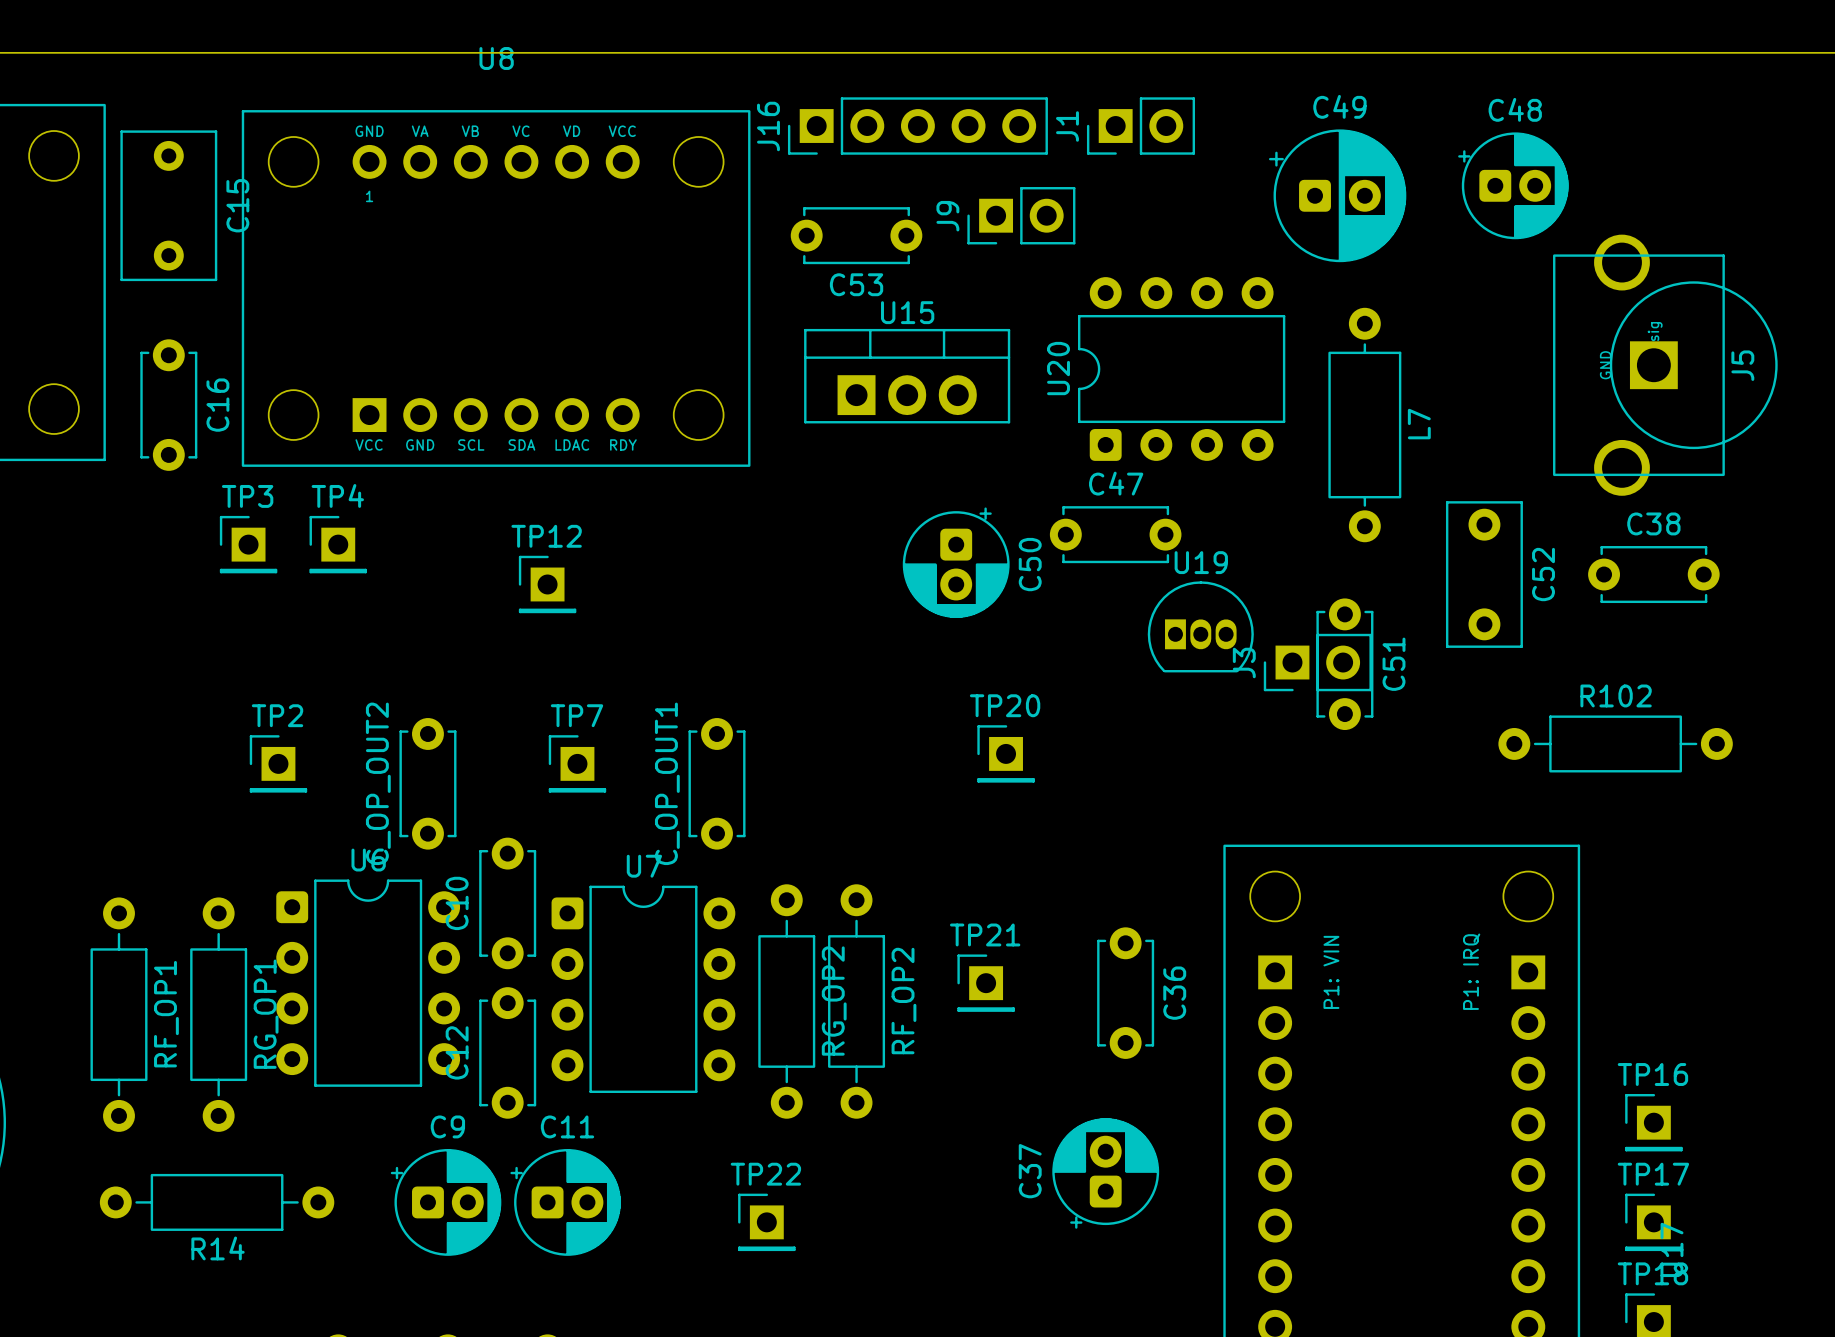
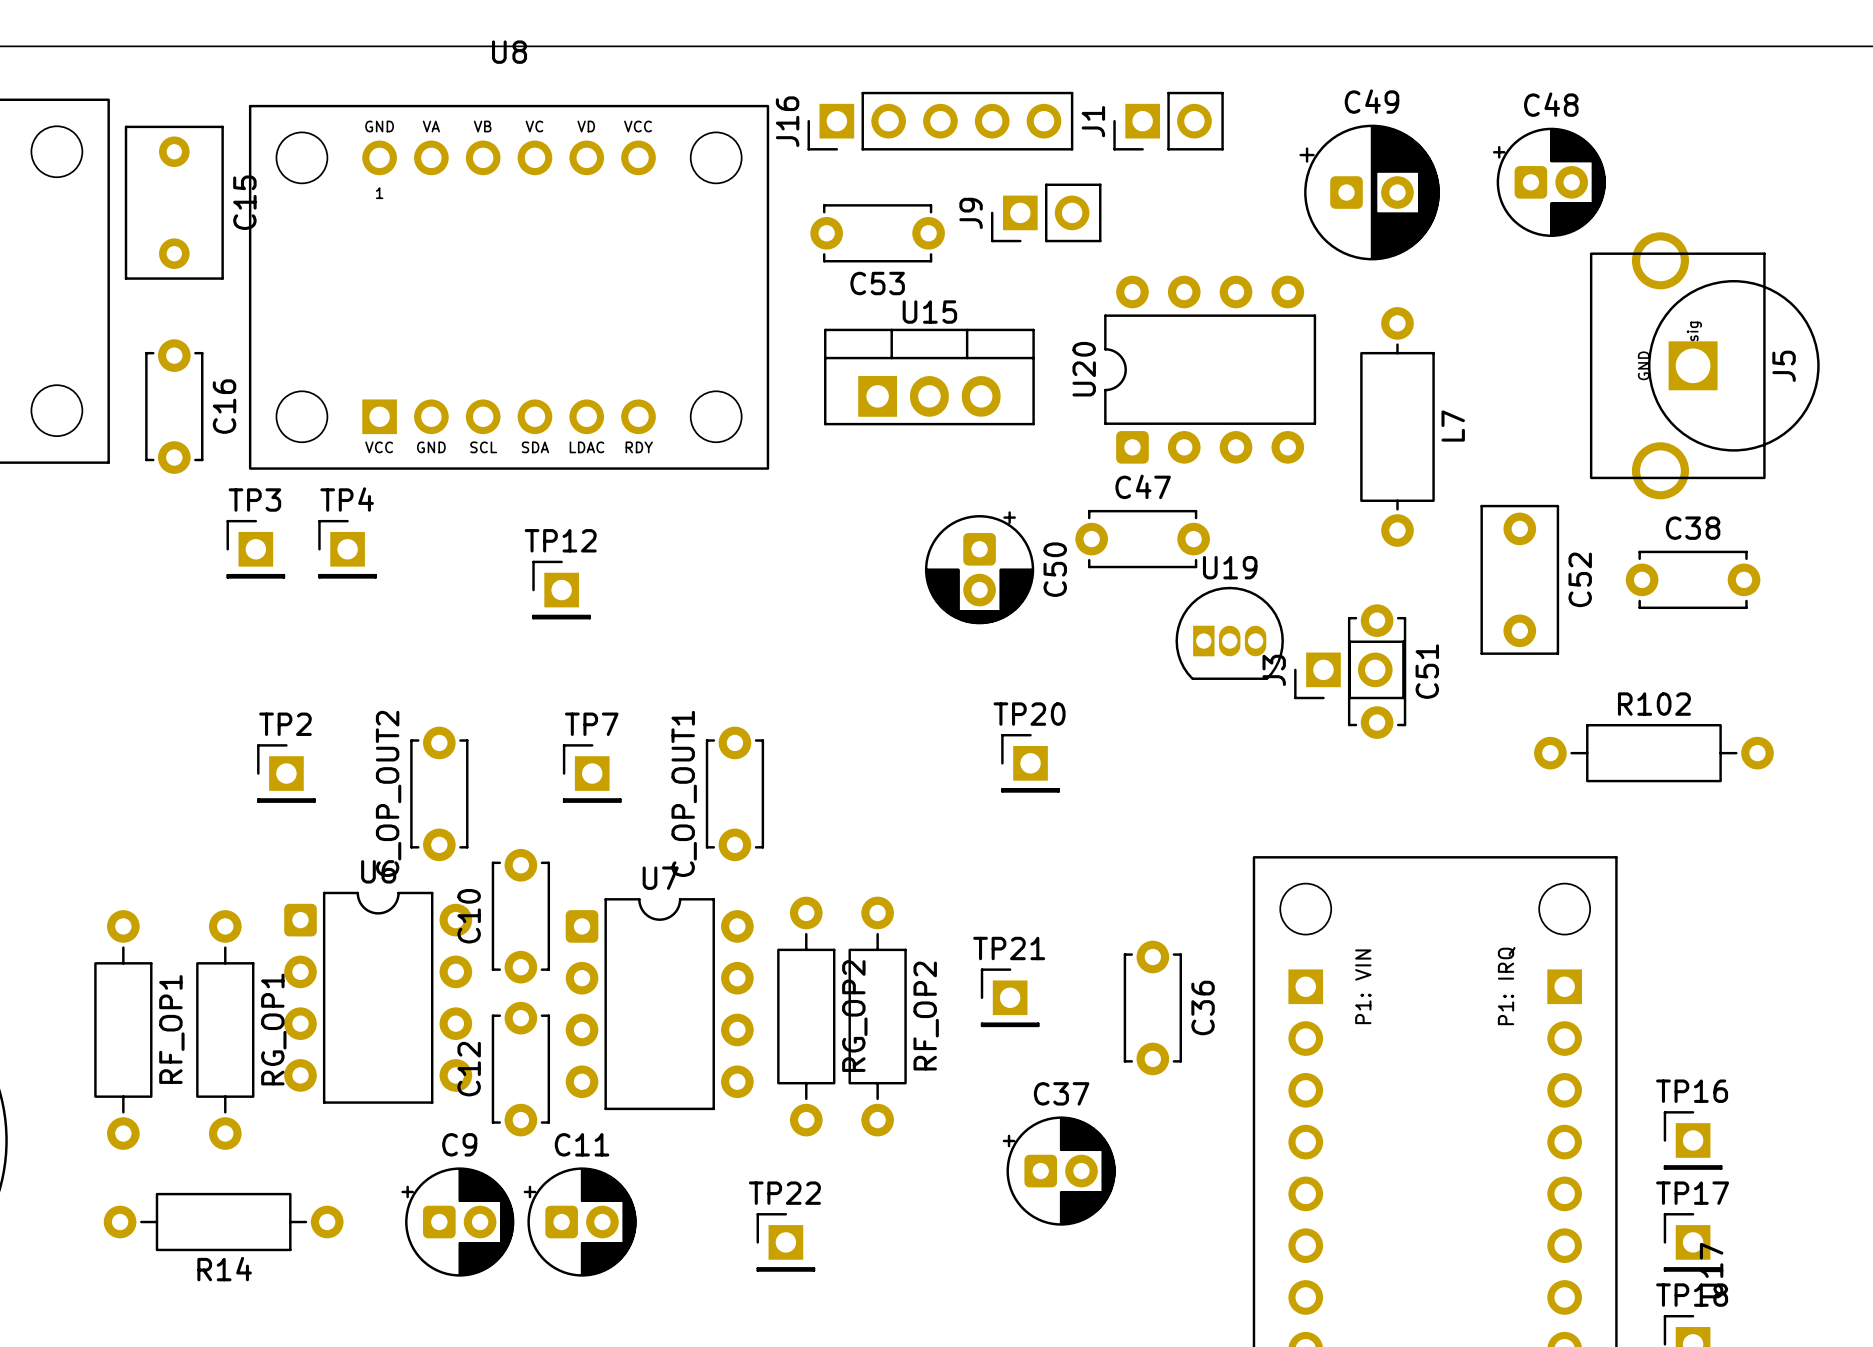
C37 rotation: 0° (1105, 1173) -> 90° clockwise (1059, 1171)
C37 position: (1105, 1173) -> (1059, 1171)

